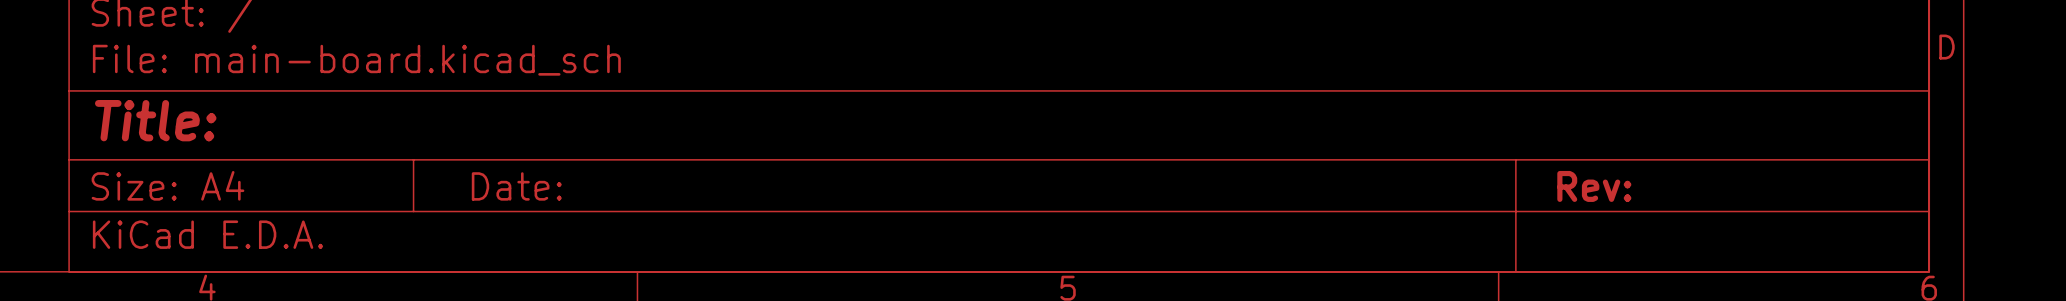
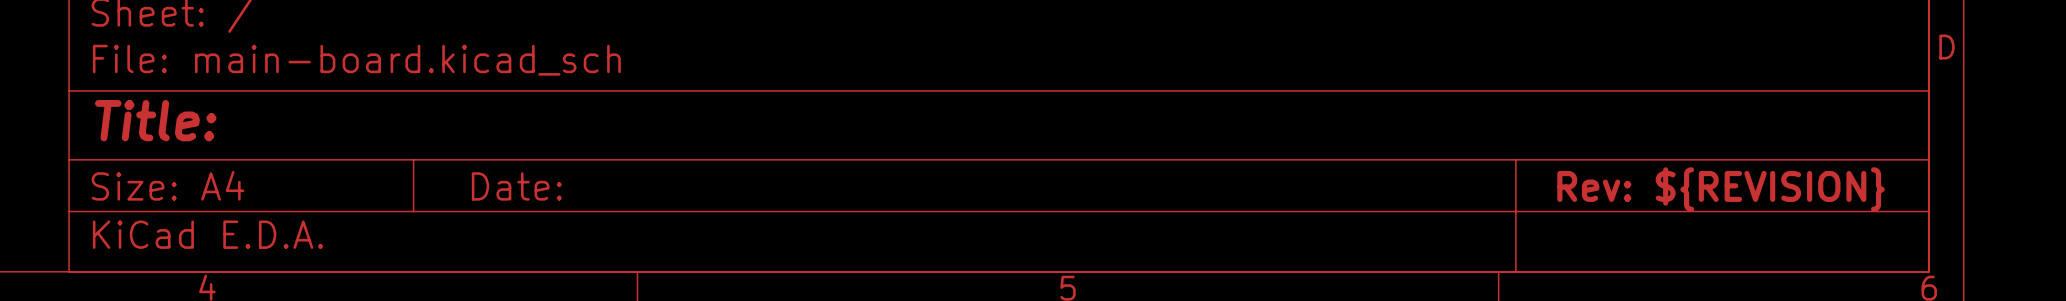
title block: Rev: (1594, 186) -> Rev: ${REVISION} (1721, 189)

